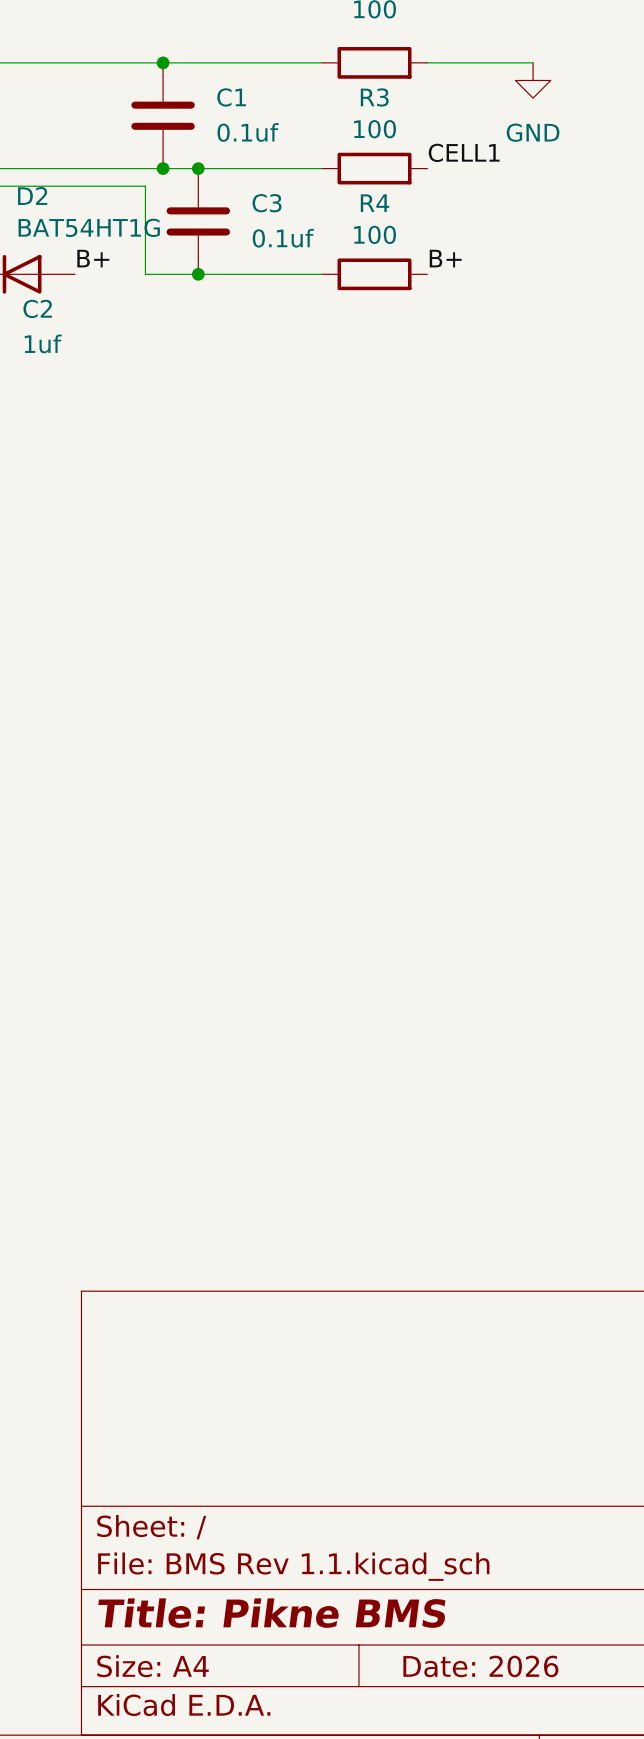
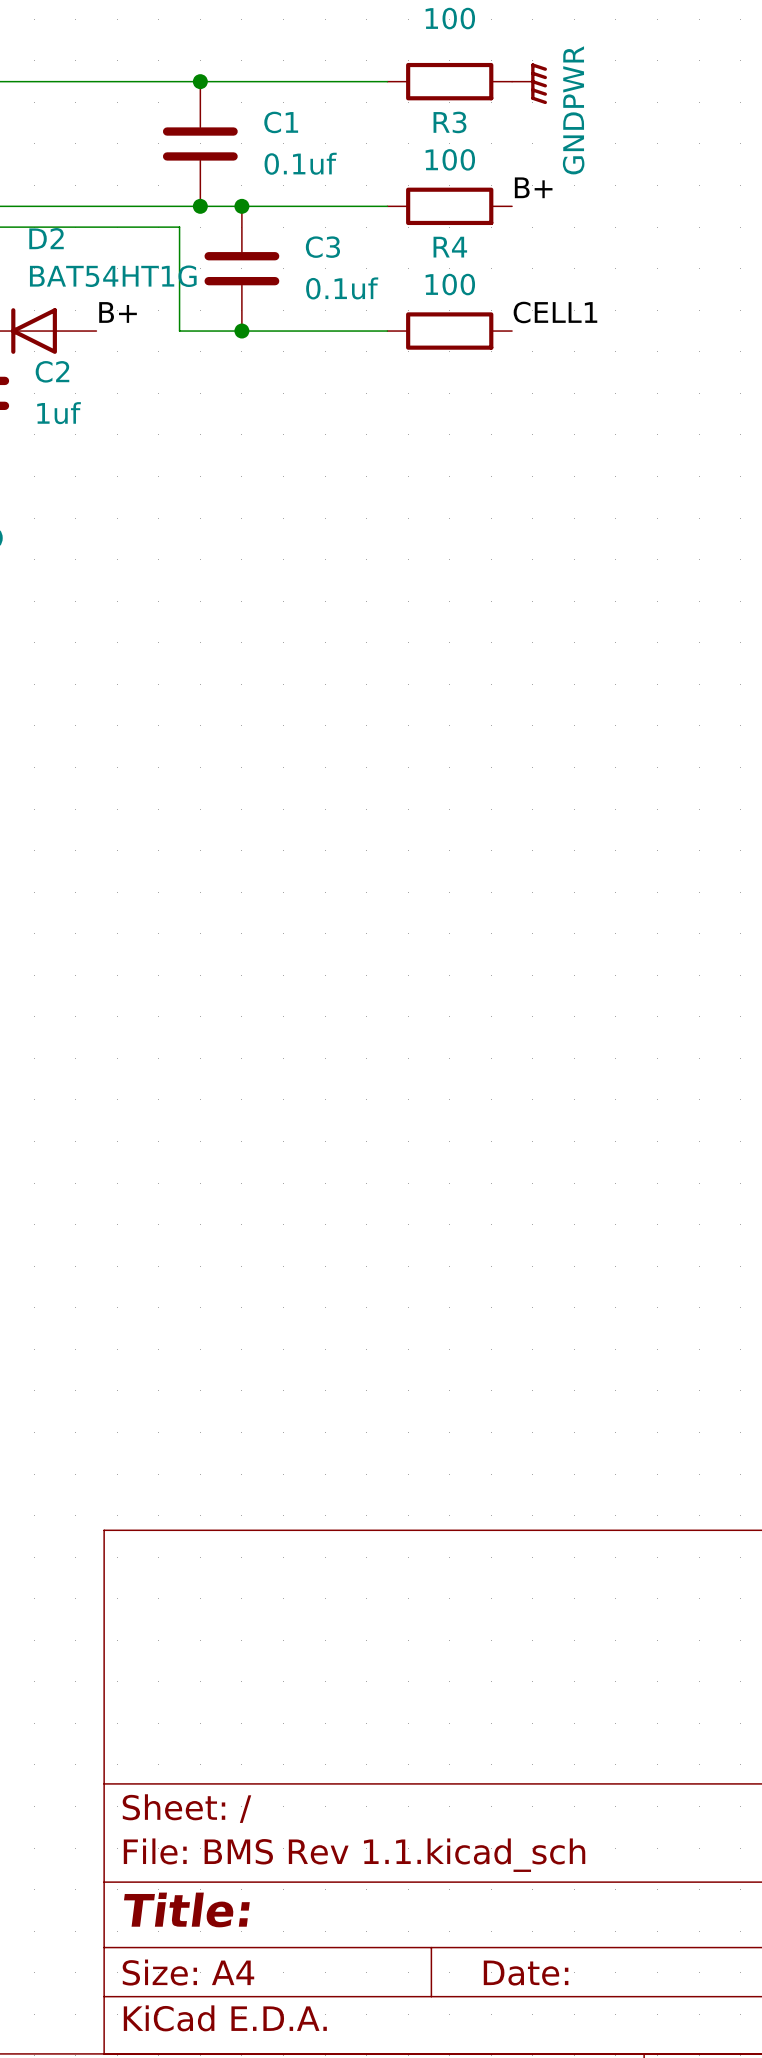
wire: (427, 62) (533, 62) -> none
power symbol: none -> GNDPWR (529, 83)
power symbol: GND (533, 80) -> none
label: CELL1 (464, 152) -> B+ (533, 187)
label: B+ (445, 258) -> CELL1 (555, 312)
title block: Title: Pikne BMS (271, 1613) -> Title: (186, 1909)
title block: Date: 2026 (480, 1666) -> Date: (526, 1973)

